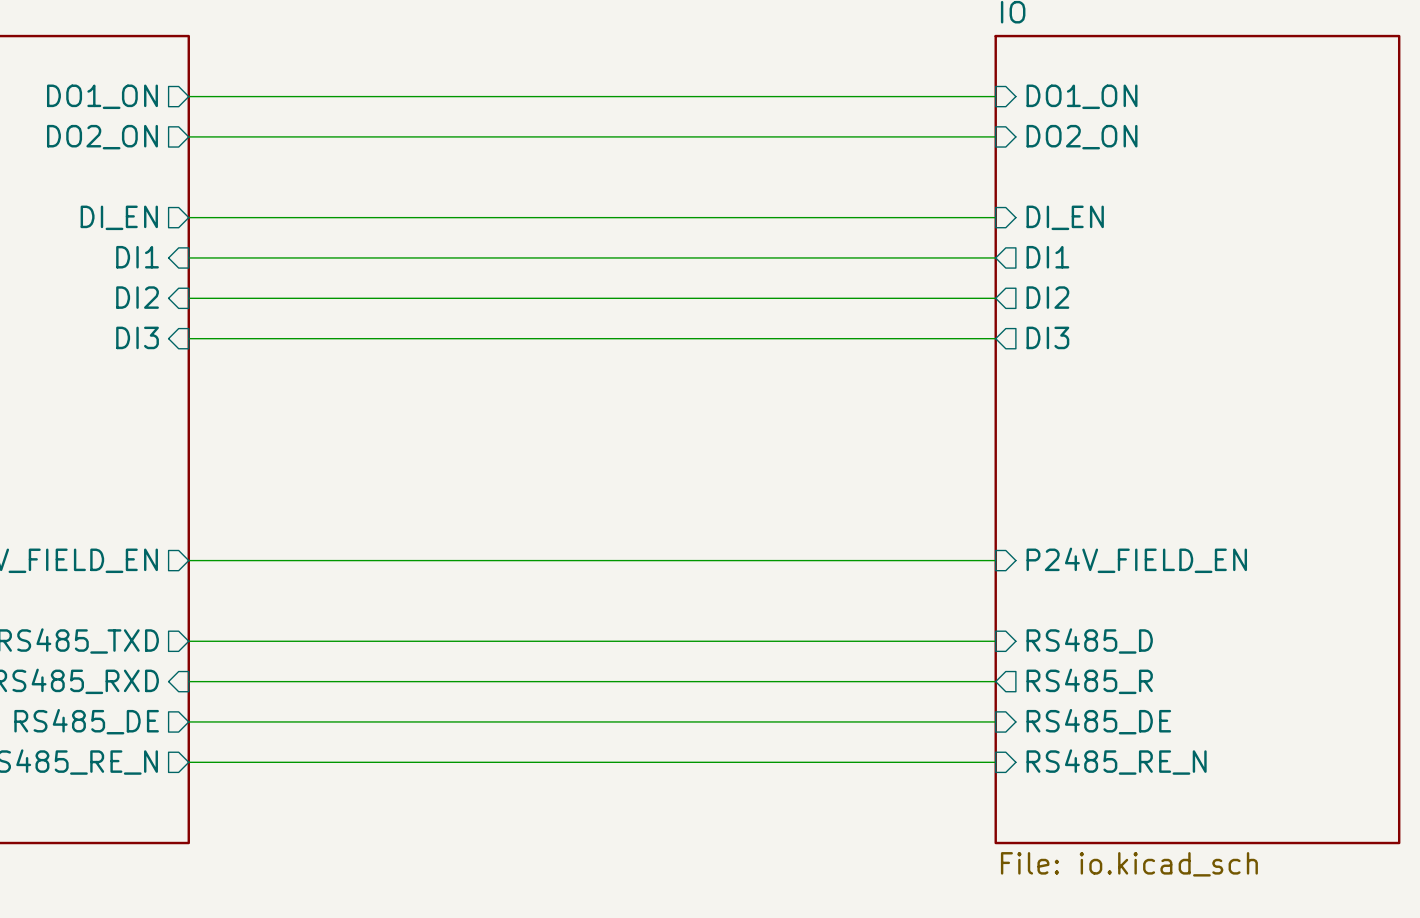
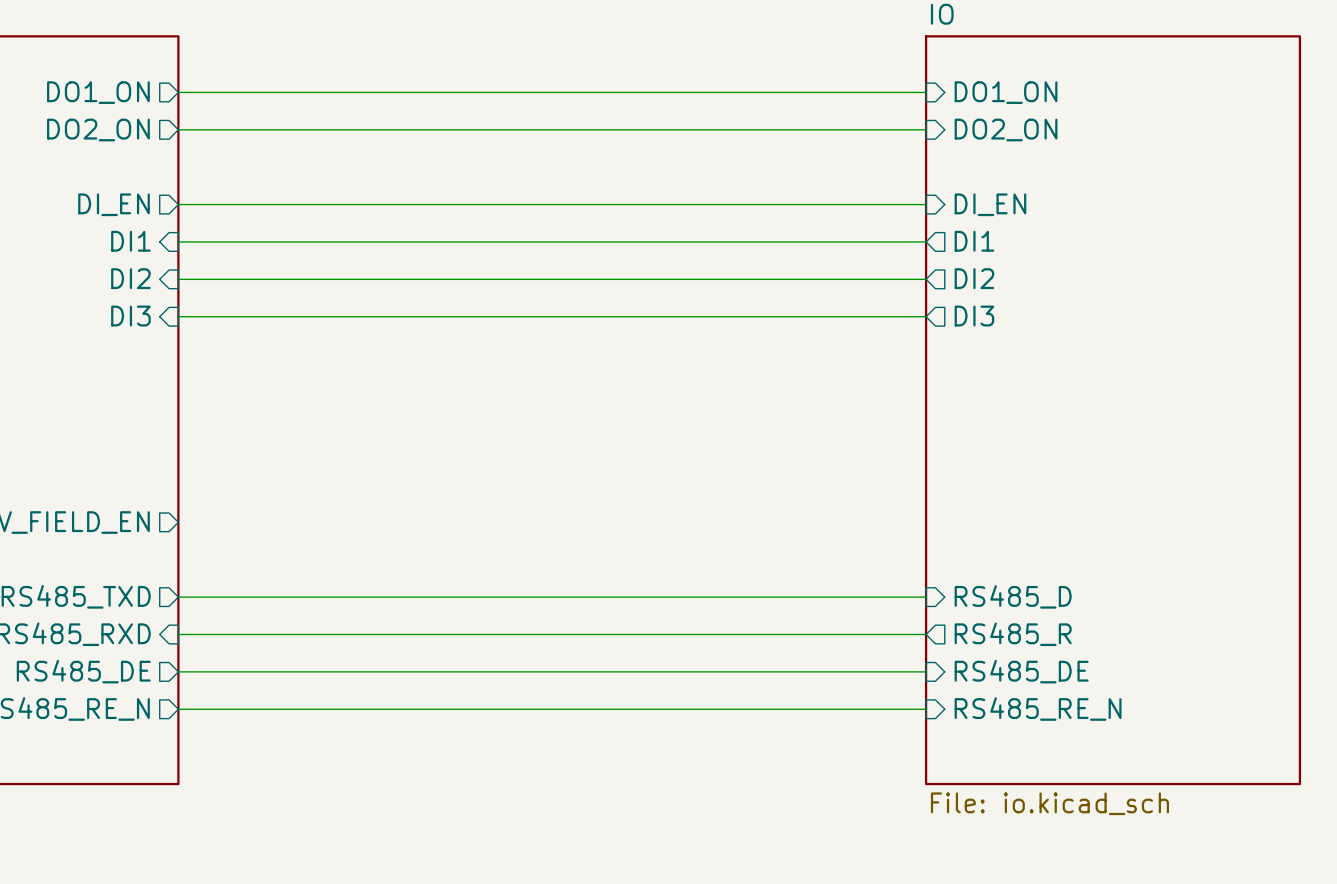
wire: (188, 560) (995, 560) -> none
sheet pin: P24V_FIELD_EN (1136, 560) -> none

